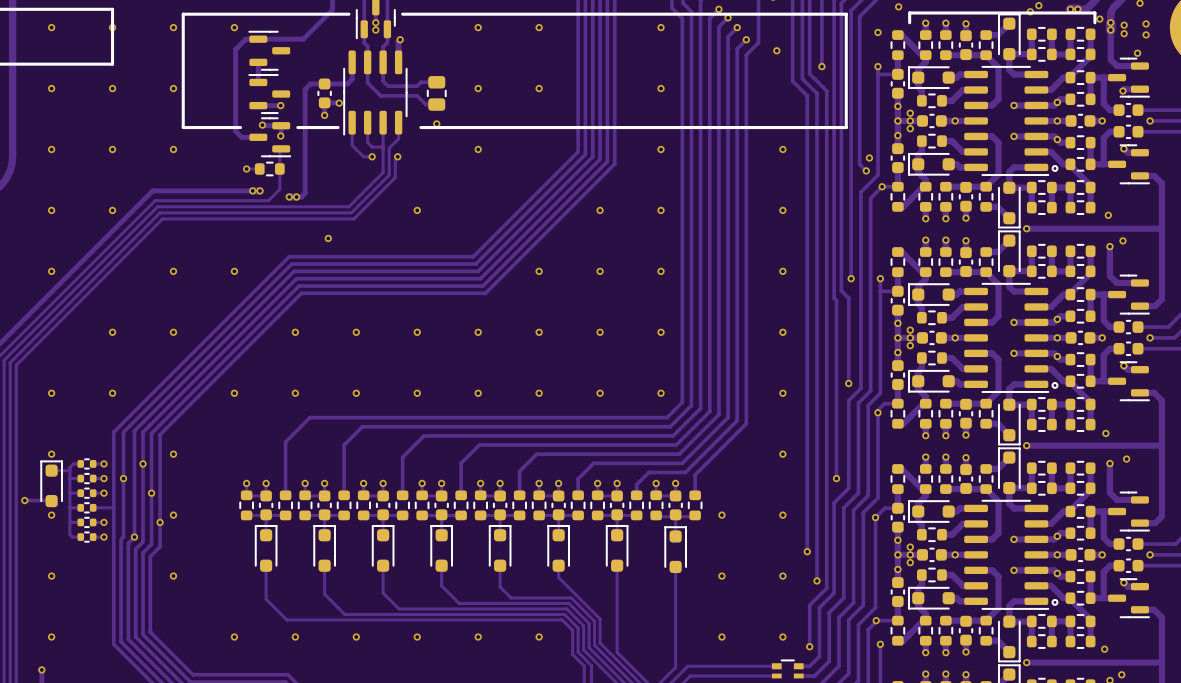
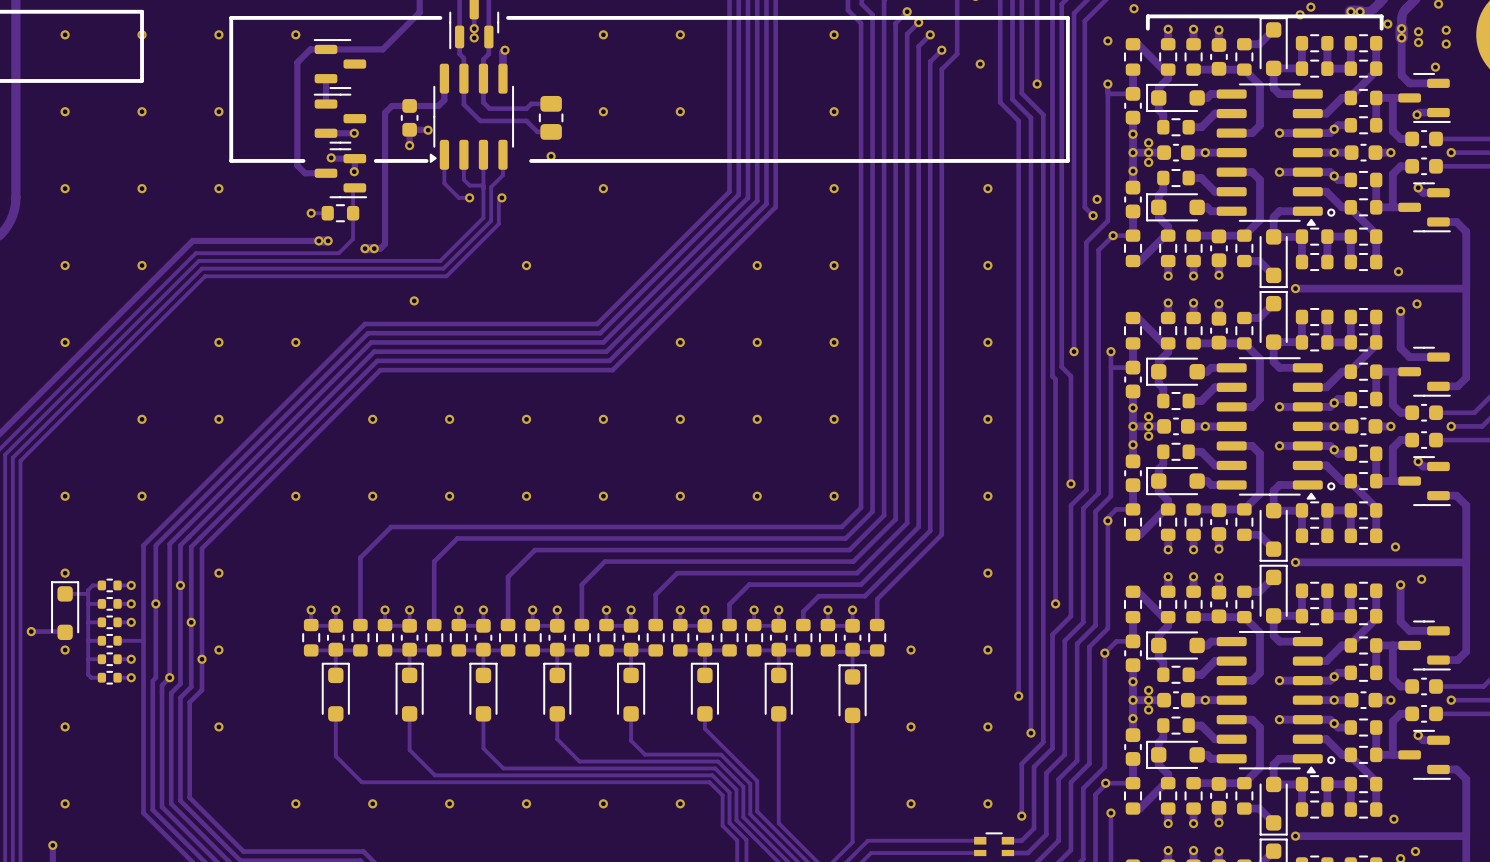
part footprint: [343, 50, 408, 136] -> [429, 63, 514, 170]
part footprint: [964, 66, 1050, 176] -> [1216, 83, 1323, 226]
part footprint: [964, 283, 1050, 393] -> [1216, 357, 1323, 500]
part footprint: [964, 500, 1050, 610] -> [1216, 631, 1323, 774]

